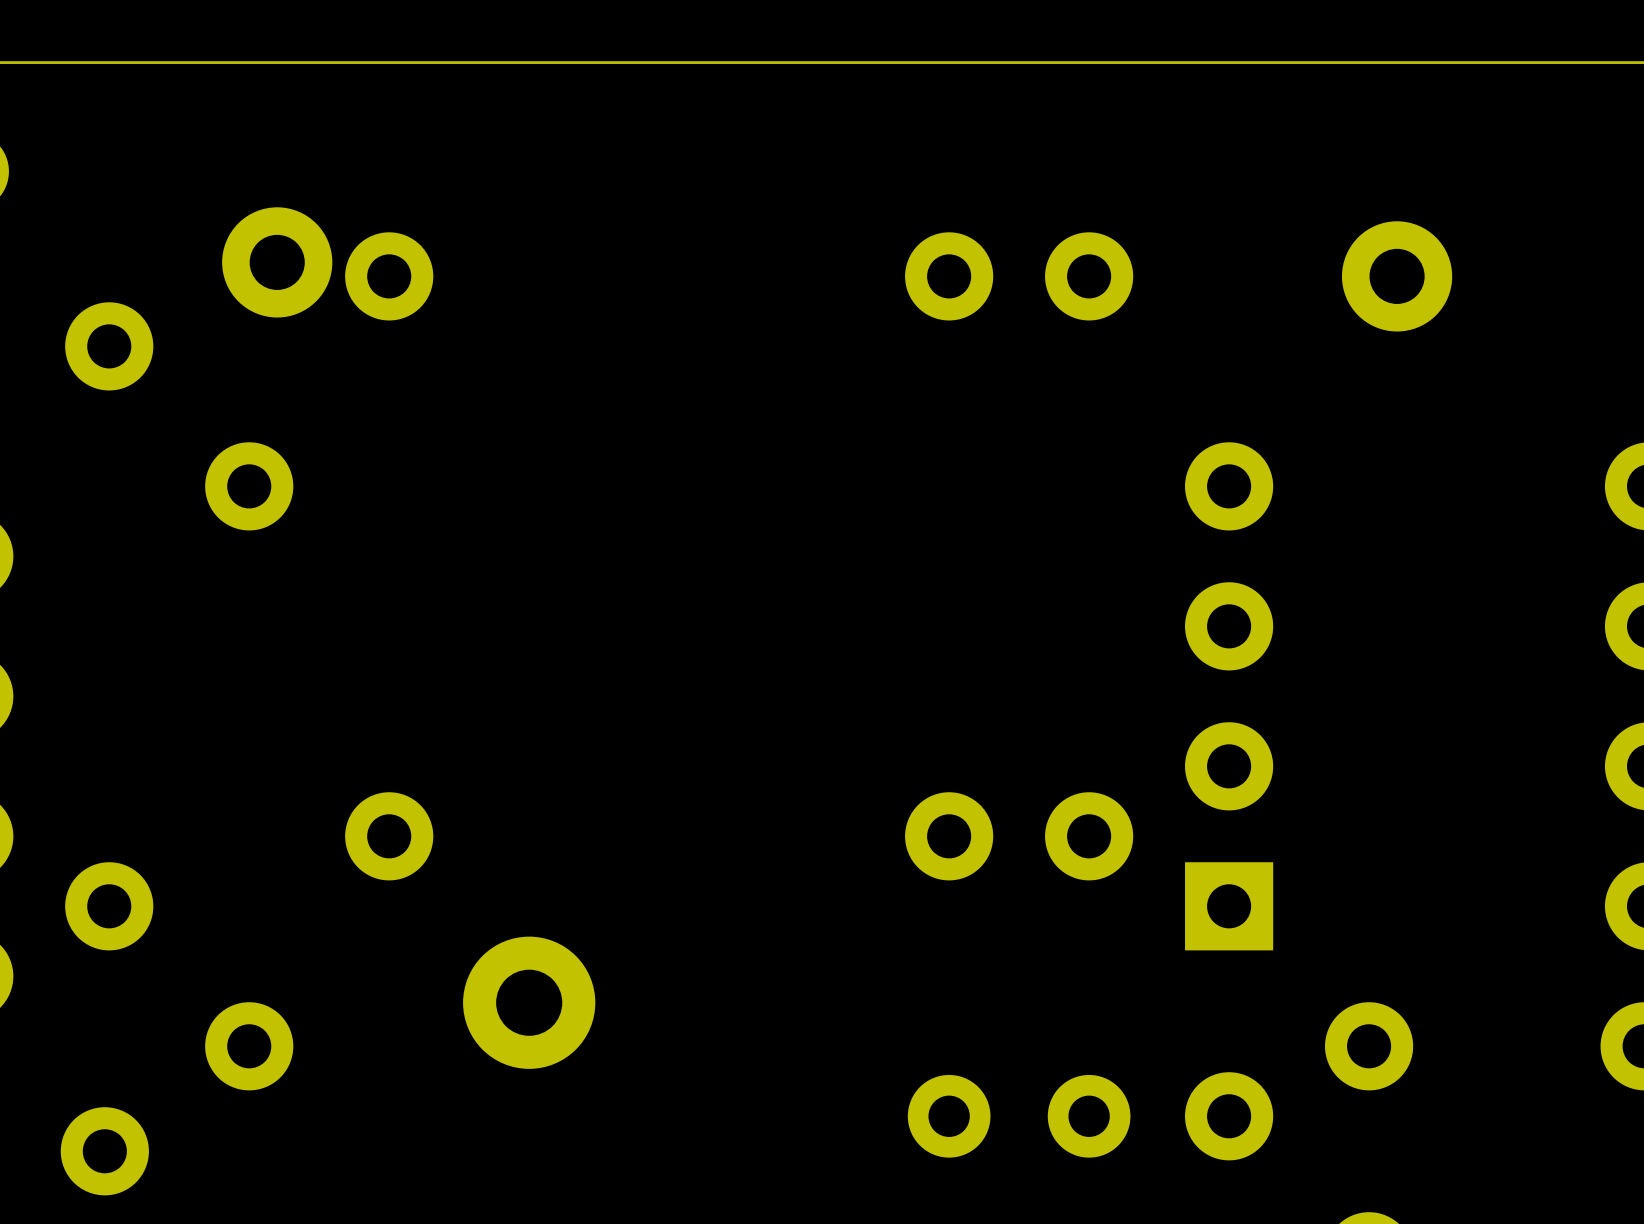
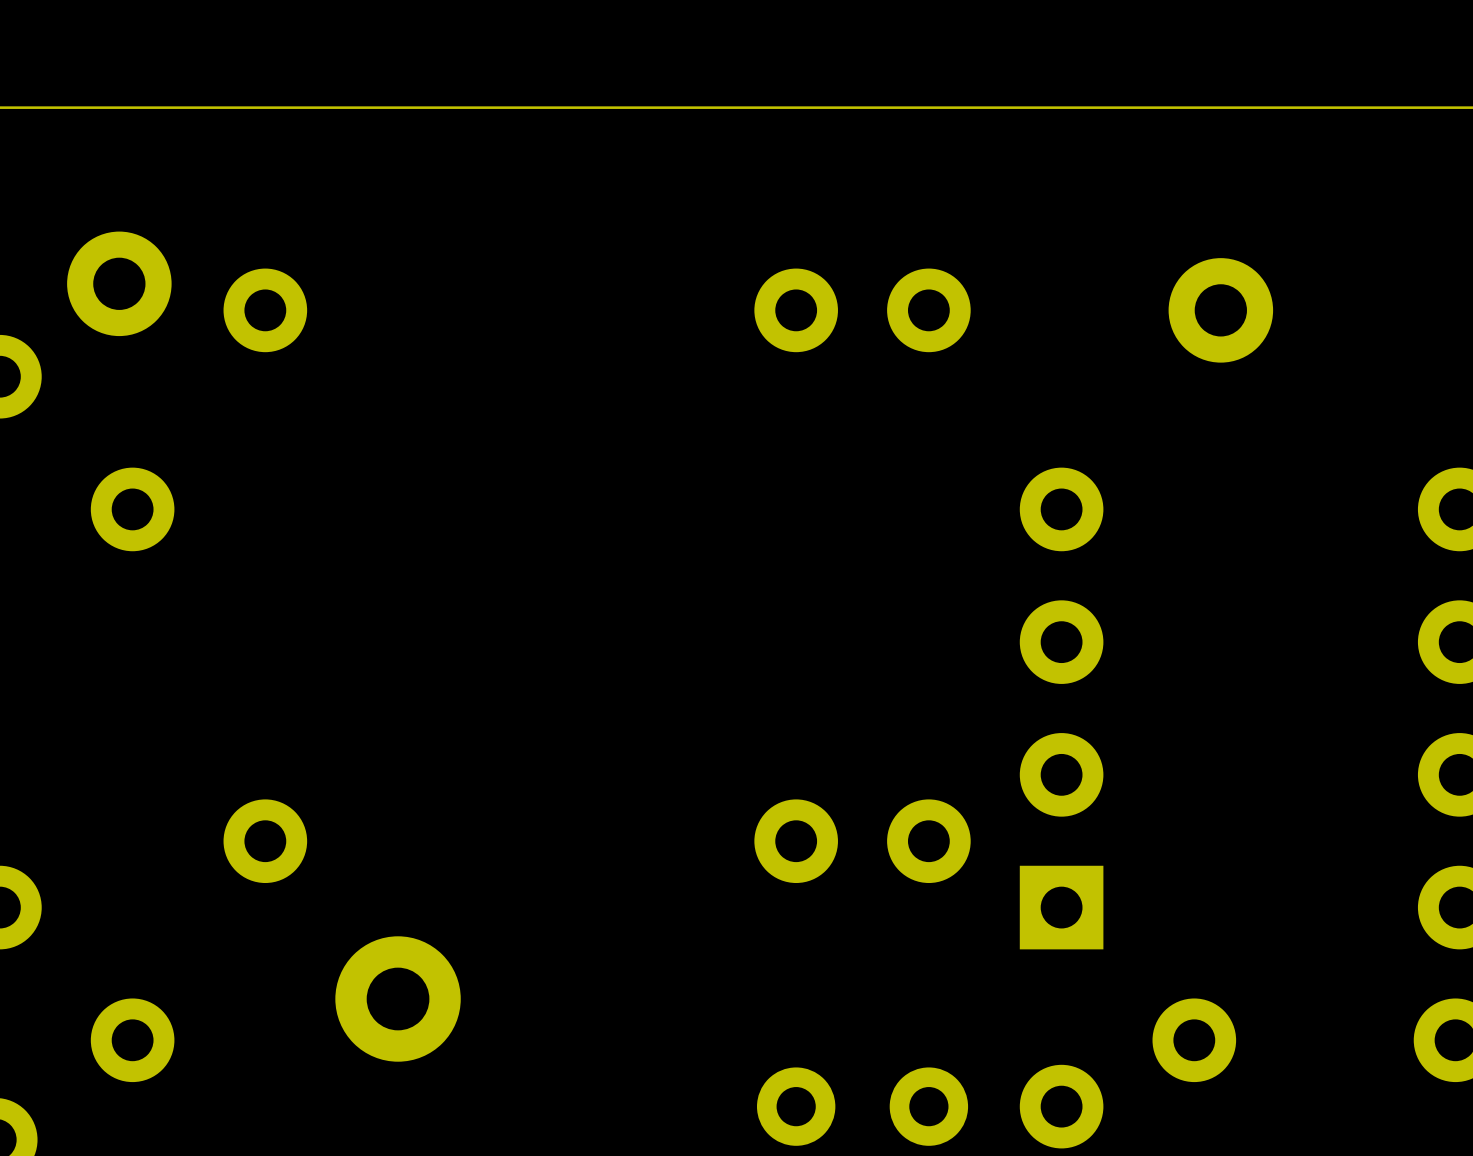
part position: (277, 262) -> (119, 283)

